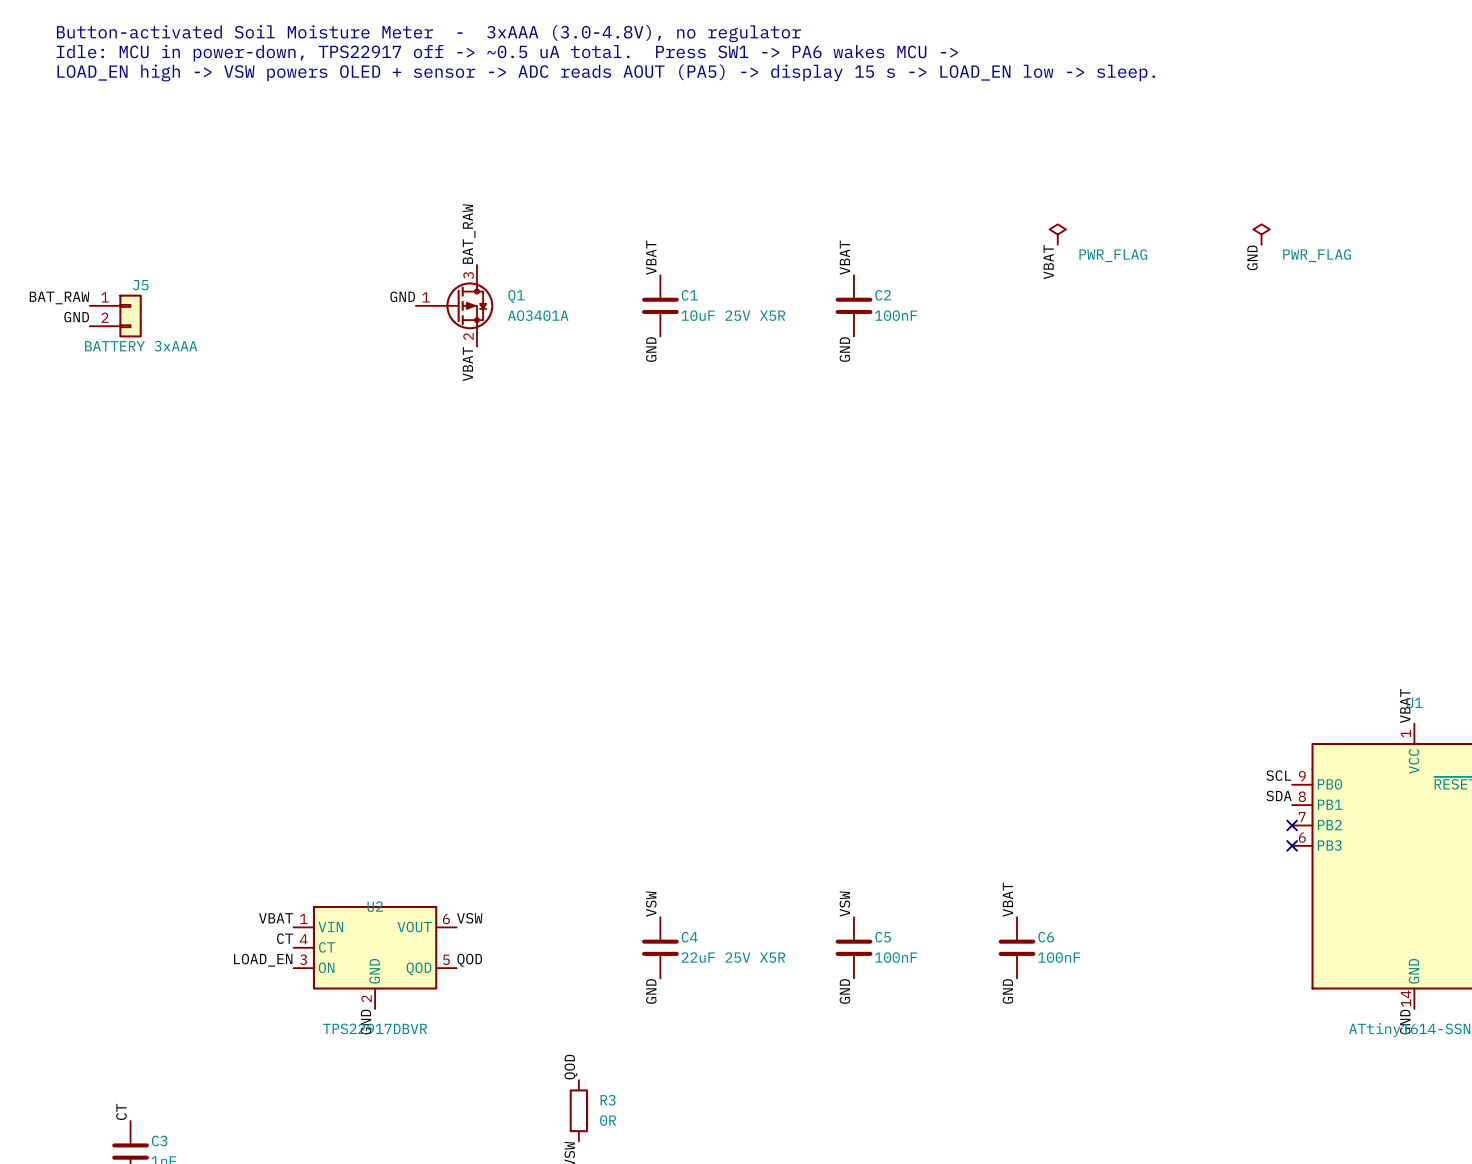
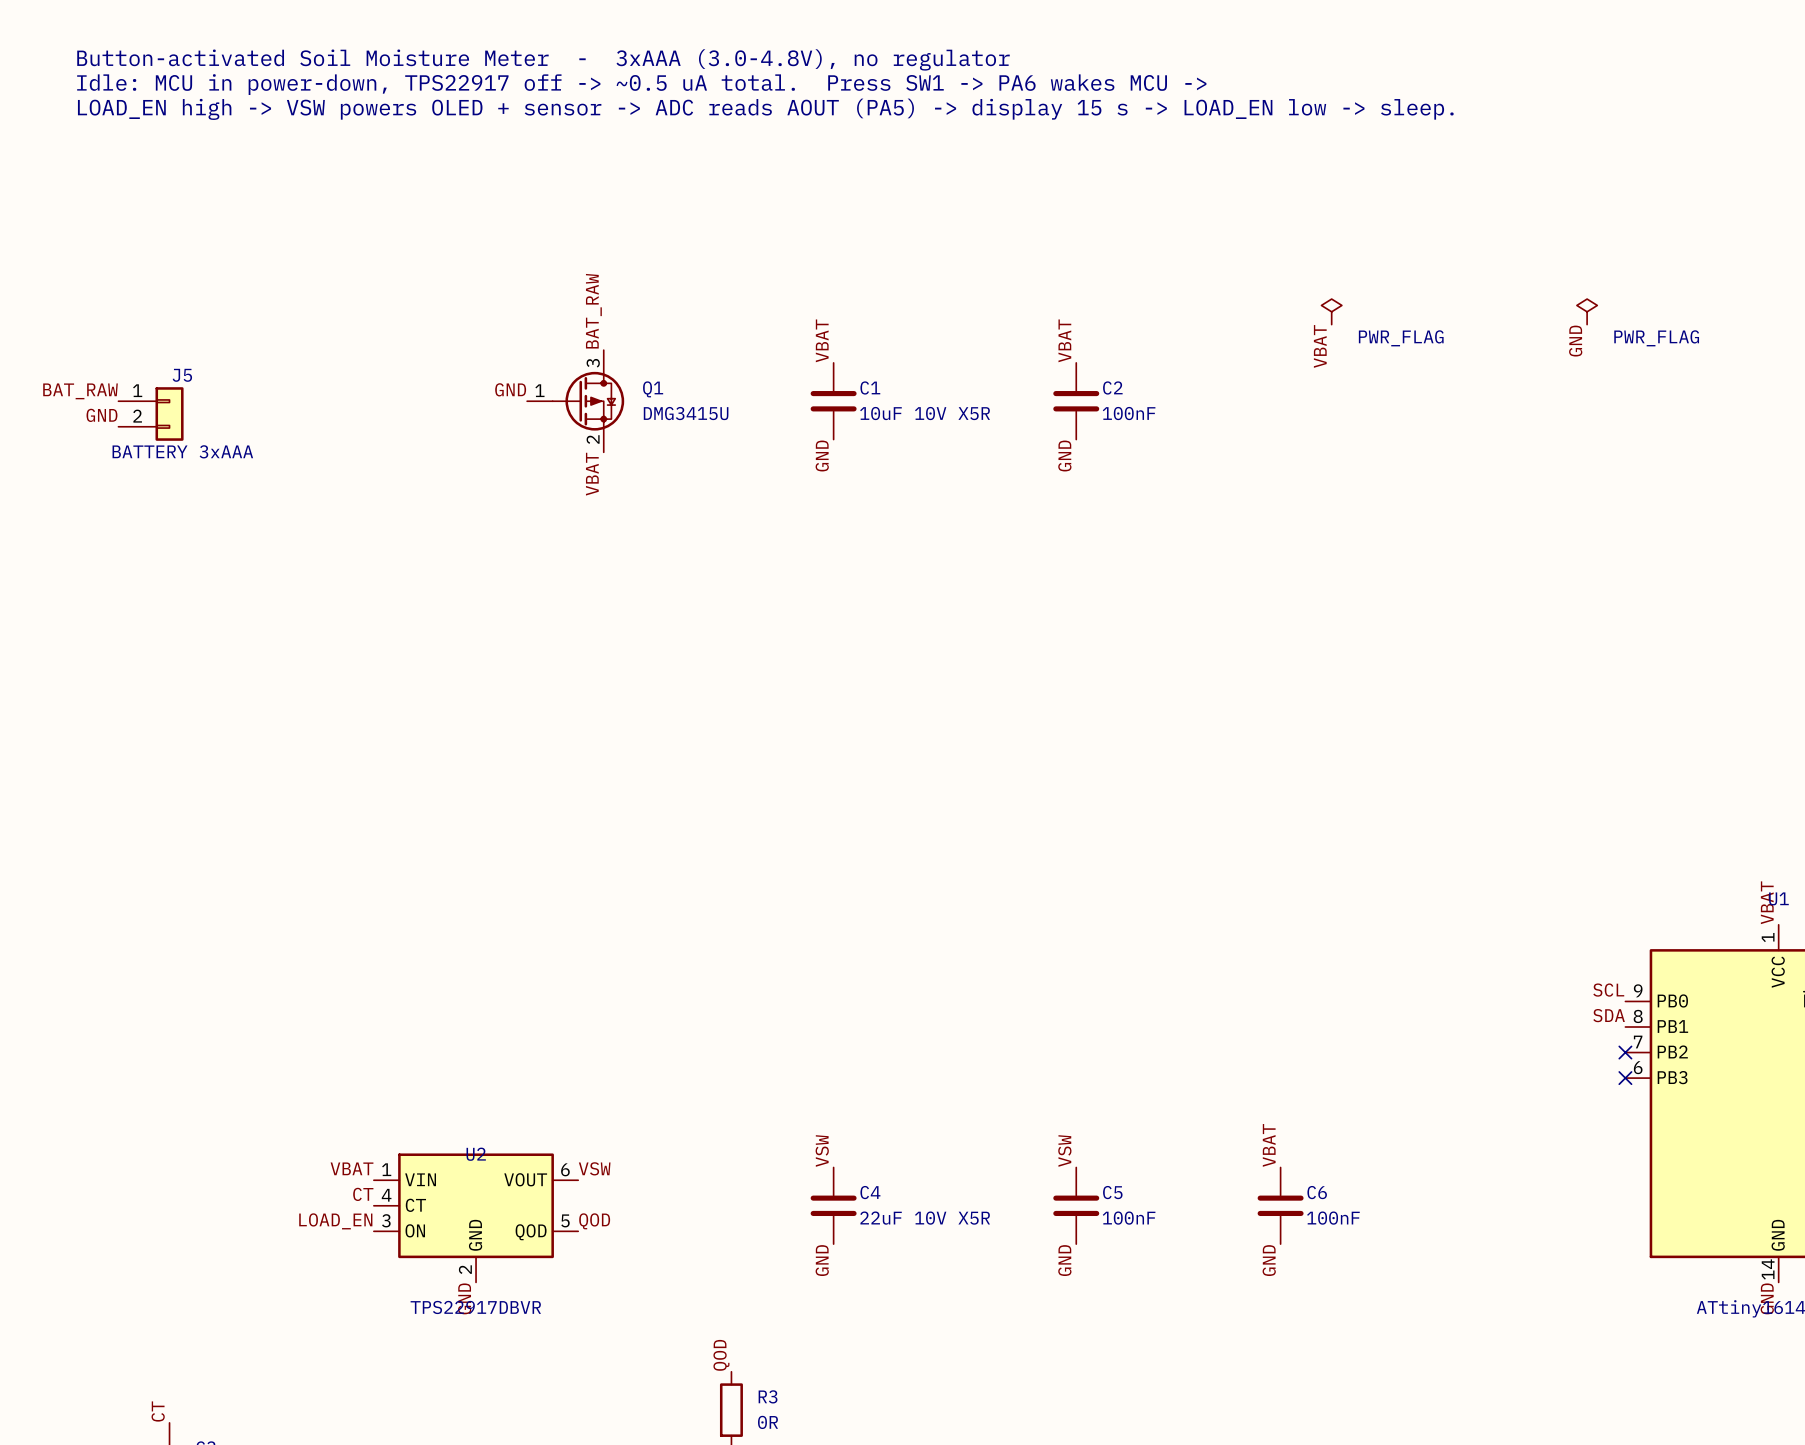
Q1 value: AO3401A (538, 315) -> DMG3415U (686, 413)
C1 value: 10uF 25V X5R (733, 315) -> 10uF 10V X5R (925, 413)
C4 value: 22uF 25V X5R (733, 957) -> 22uF 10V X5R (925, 1218)

